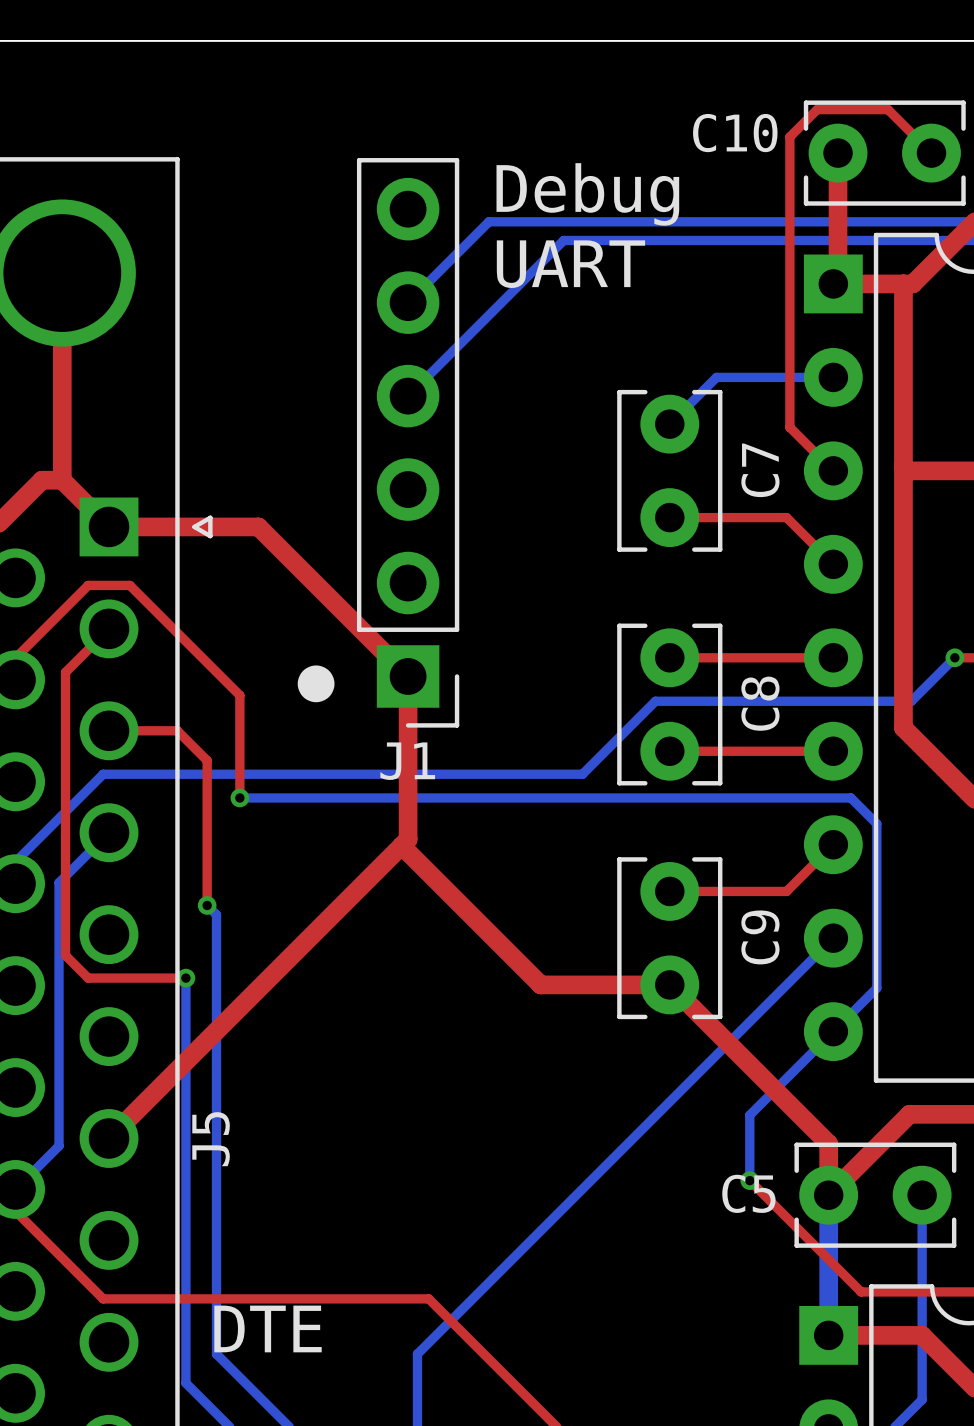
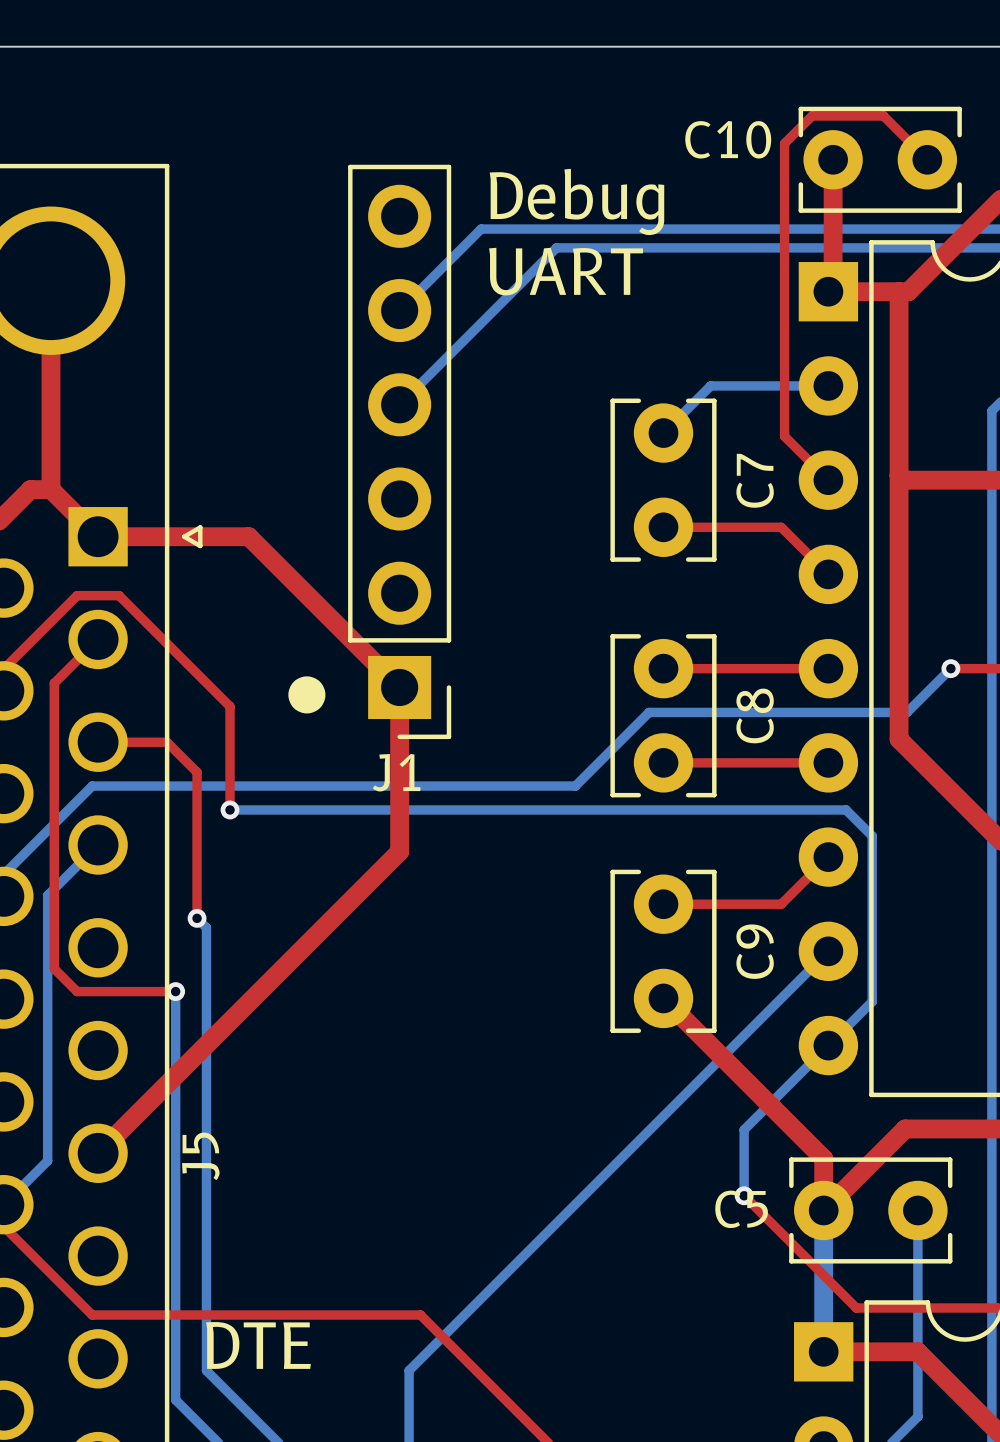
top track: (401, 845) (540, 984) (669, 984) -> none

